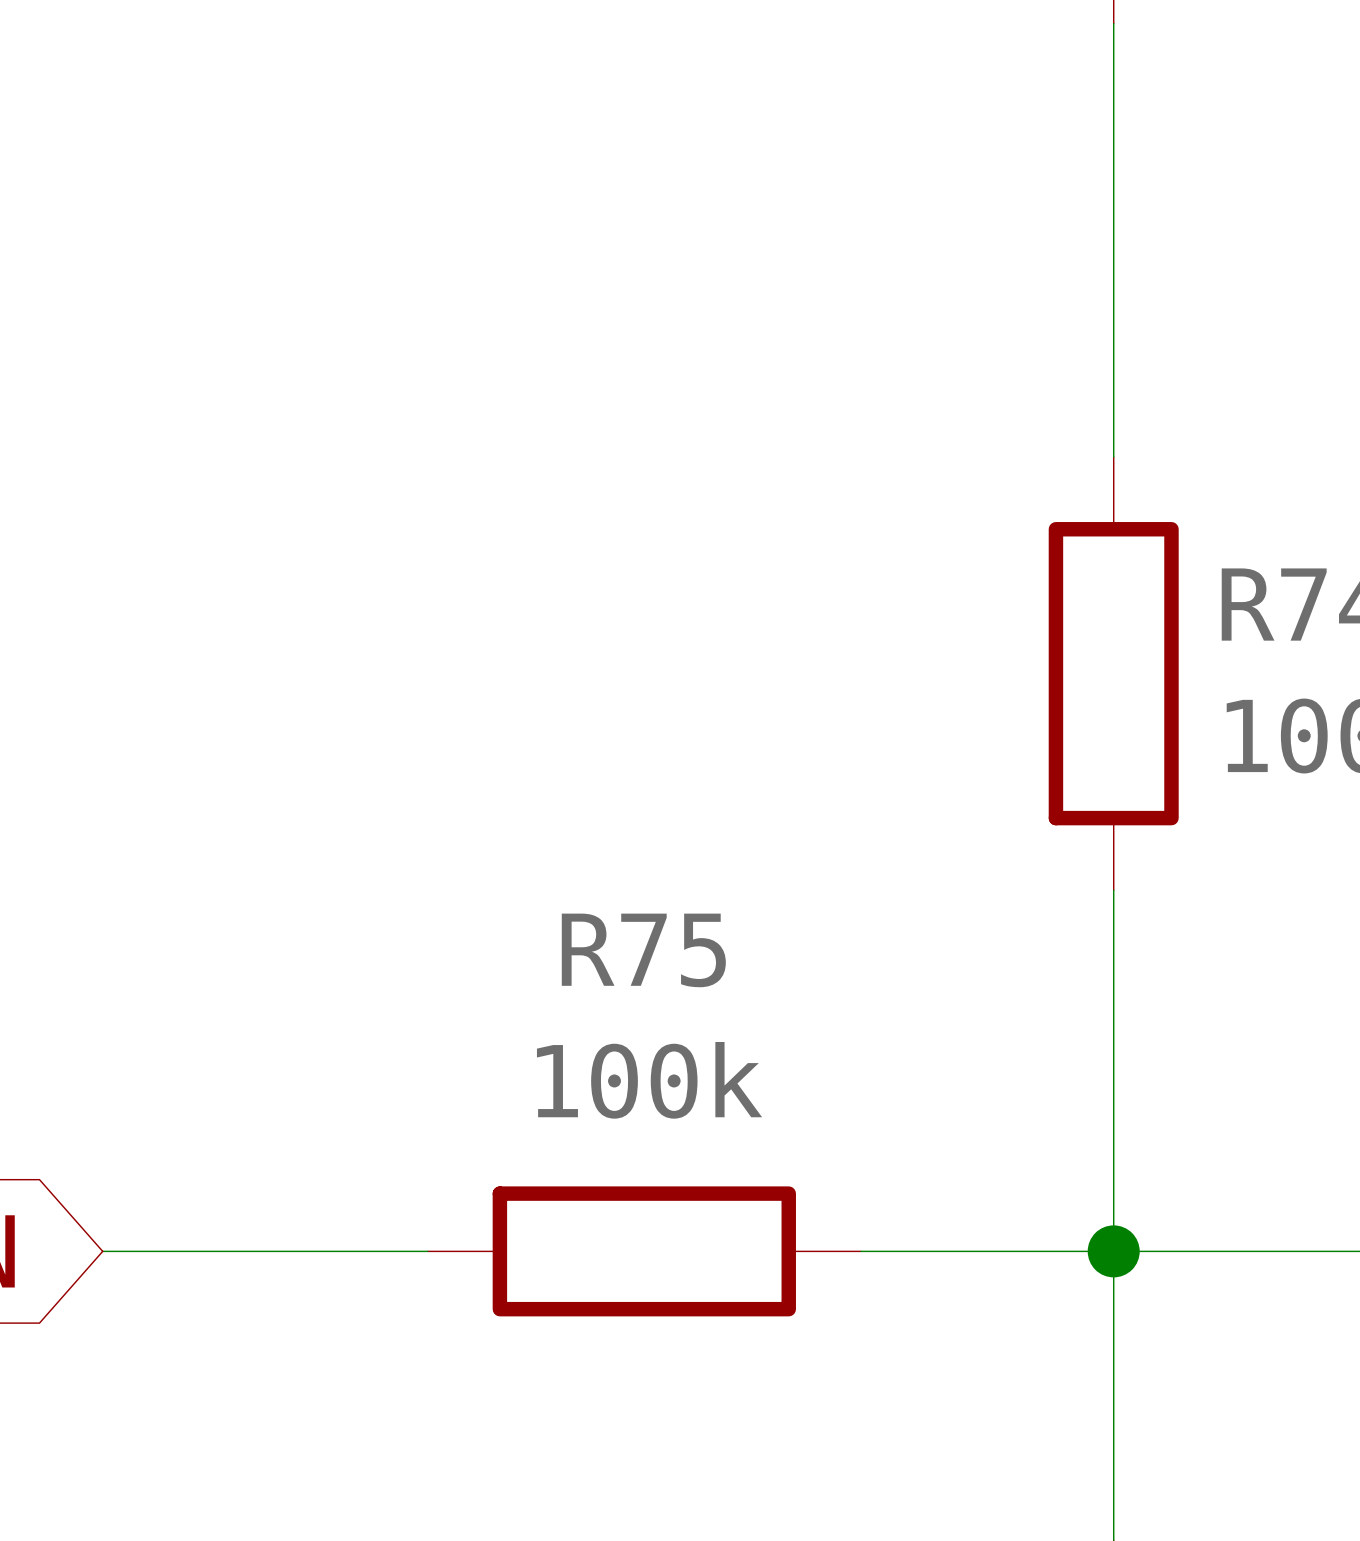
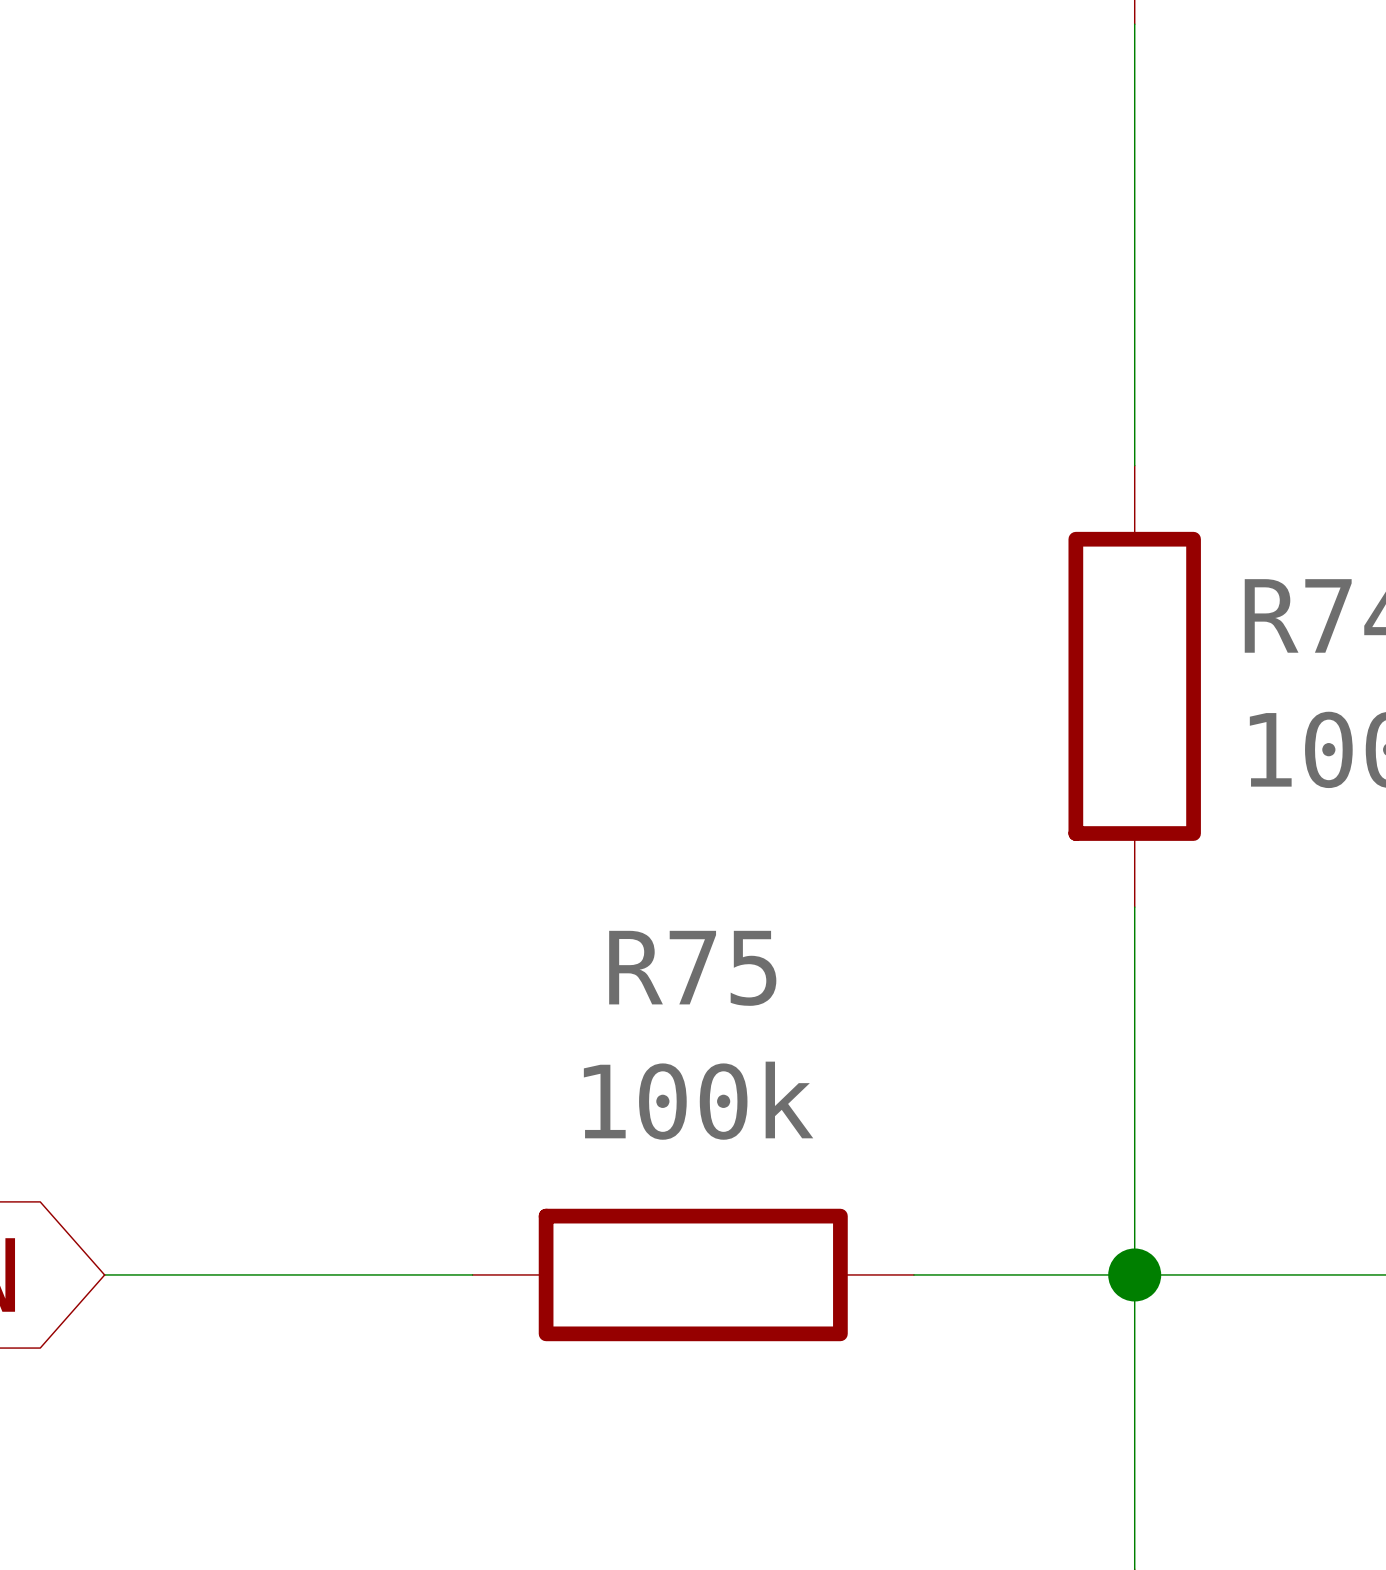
R75 position: (644, 1251) -> (693, 1274)

